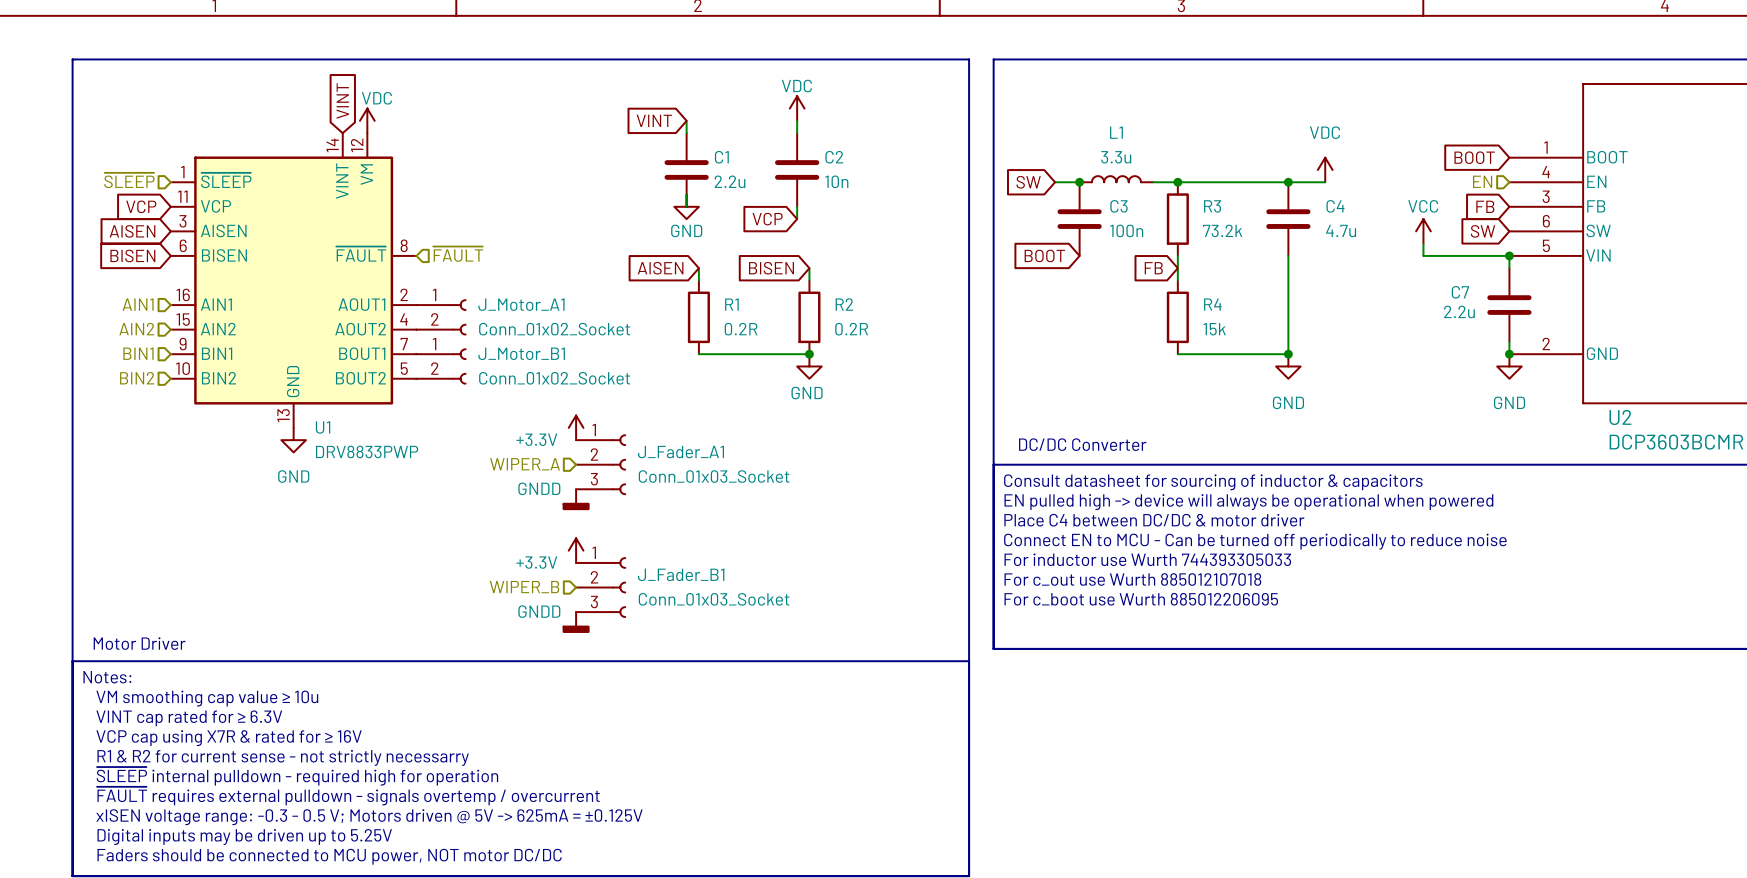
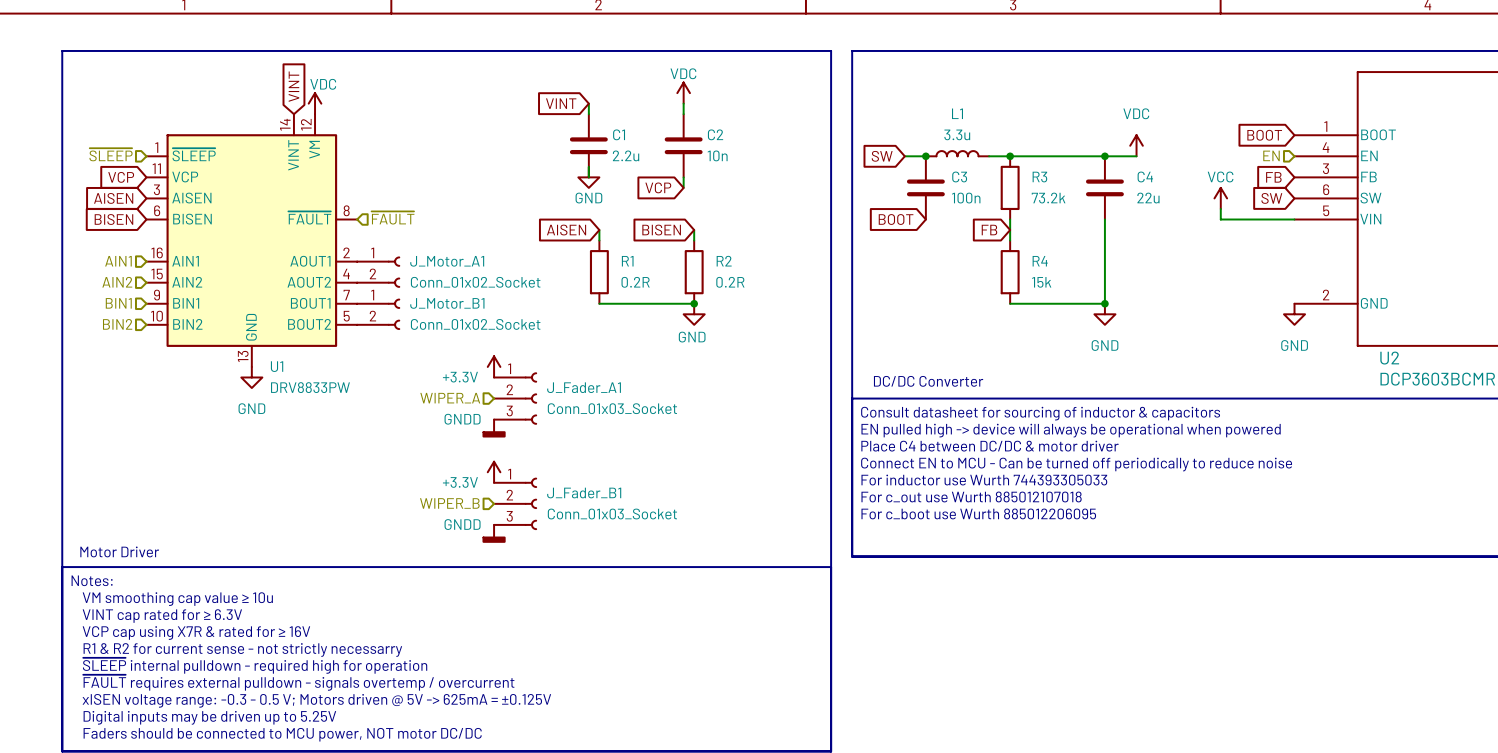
C4 value: 4.7u (1341, 230) -> 22u (1148, 198)
wire: (1509, 255) (1509, 268) -> none
junction: (1509, 255) -> none
C7: 2.2u (1509, 305) -> none
wire: (1509, 341) (1509, 354) -> none
junction: (1509, 354) -> none
U1 value: DRV8833PWP (367, 451) -> DRV8833PW (310, 387)

